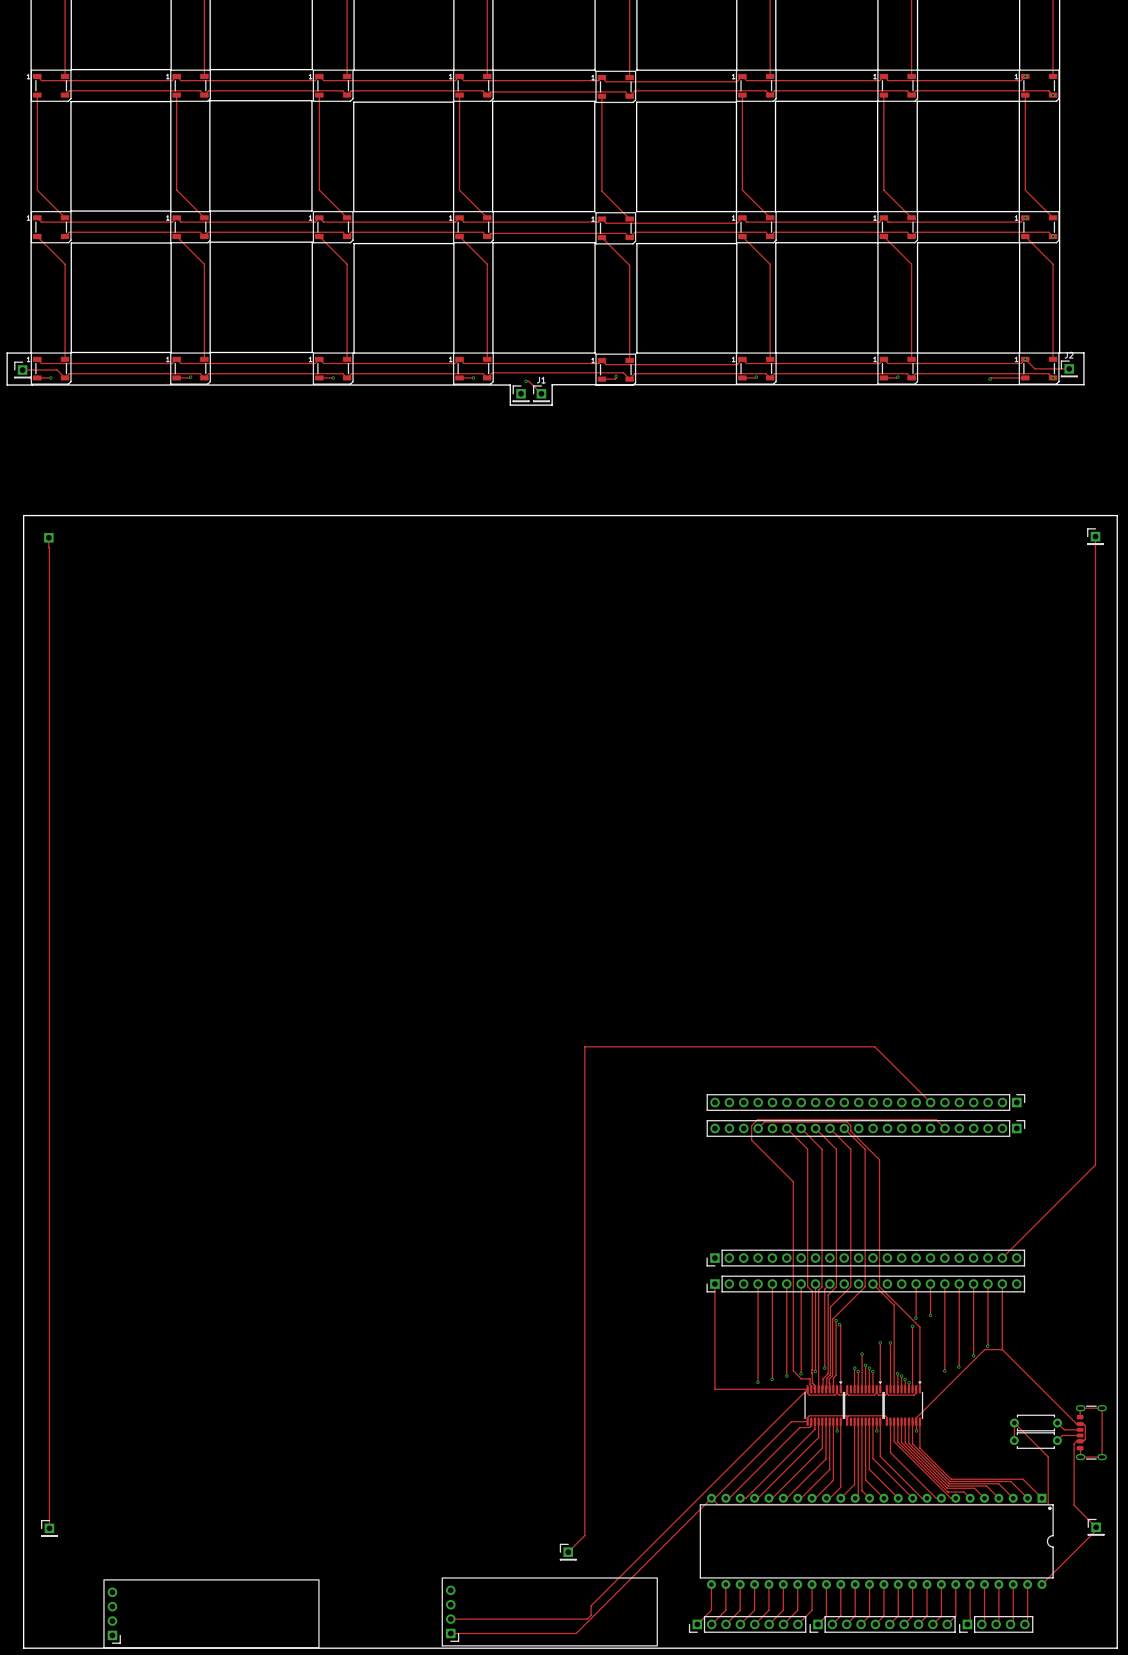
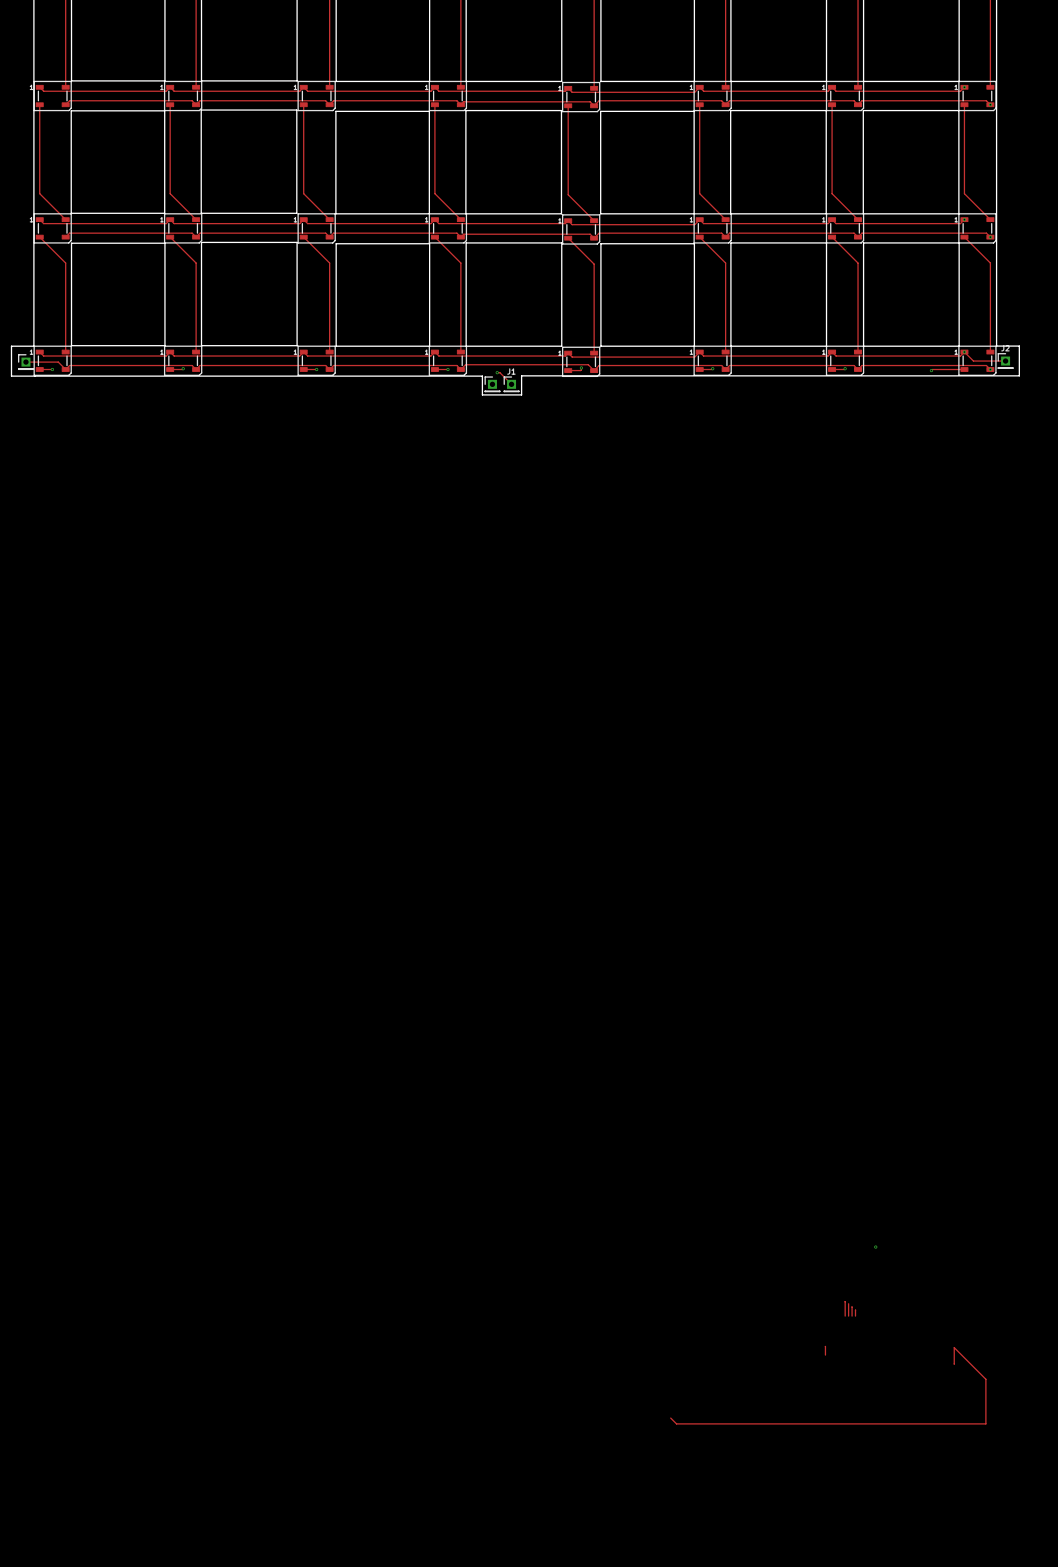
board edge: (23, 515) (1117, 515) (1117, 1648) (23, 1648) (23, 515) -> none
track: (1095, 536) (1095, 1164) (1002, 1258) -> none
part: (1095, 536) -> none
track: (48, 537) (49, 1528) -> none
part: (48, 537) -> none
part: (865, 1102) -> none
track: (930, 1102) (874, 1046) (584, 1046) (584, 1535) (568, 1552) -> none
track: (758, 1128) (764, 1121) (847, 1121) (850, 1125) (850, 1131) (879, 1159) (879, 1286) (919, 1327) (919, 1389) -> none
track: (786, 1128) (807, 1149) (807, 1286) (812, 1291) (811, 1372) (812, 1383) (814, 1389) -> none
track: (801, 1128) (822, 1149) (822, 1286) (818, 1290) (818, 1389) -> none
track: (815, 1128) (836, 1149) (836, 1286) (828, 1294) (828, 1373) (823, 1378) (822, 1389) -> none
track: (830, 1128) (850, 1149) (850, 1286) (830, 1307) (830, 1374) (826, 1378) (826, 1389) -> none
track: (844, 1128) (865, 1149) (865, 1286) (832, 1319) (832, 1375) (829, 1379) (829, 1389) -> none
part: (865, 1128) -> none
track: (944, 1128) (936, 1119) (757, 1119) (751, 1125) (751, 1140) (793, 1181) (793, 1370) (801, 1378) (810, 1378) (811, 1389) -> none
part: (865, 1258) -> none
track: (714, 1284) (714, 1389) (807, 1389) -> none
track: (758, 1284) (758, 1382) -> none
track: (772, 1284) (772, 1379) -> none
track: (786, 1284) (786, 1376) -> none
track: (801, 1284) (800, 1373) -> none
track: (815, 1284) (815, 1371) -> none
track: (829, 1284) (824, 1289) (824, 1368) -> none
part: (865, 1284) -> none
track: (873, 1284) (894, 1305) (894, 1389) -> none
track: (916, 1284) (915, 1318) -> none
track: (930, 1284) (930, 1315) -> none
track: (944, 1284) (944, 1370) -> none
track: (959, 1284) (958, 1367) -> none
track: (973, 1284) (973, 1355) -> none
track: (987, 1284) (987, 1346) -> none
track: (1002, 1284) (1002, 1349) -> none
via: (915, 1318) -> none
track: (836, 1320) (836, 1375) (833, 1378) (833, 1389) -> none
via: (836, 1320) -> none
track: (839, 1324) (840, 1389) -> none
via: (839, 1324) -> none
track: (912, 1326) (912, 1389) -> none
via: (912, 1326) -> none
track: (880, 1342) (880, 1389) -> none
via: (880, 1342) -> none
track: (890, 1342) (890, 1389) -> none
via: (890, 1342) -> none
via: (987, 1346) -> none
track: (1002, 1349) (1076, 1424) (1085, 1425) (1085, 1439) (1076, 1441) (1074, 1443) (1074, 1505) (1096, 1527) (1096, 1530) (1041, 1584) -> none
track: (1002, 1349) (984, 1349) (916, 1417) (916, 1430) -> none
track: (862, 1354) (861, 1389) -> none
via: (862, 1354) -> none
via: (973, 1355) -> none
track: (865, 1365) (865, 1389) -> none
via: (865, 1365) -> none
via: (958, 1367) -> none
via: (824, 1368) -> none
track: (854, 1368) (854, 1389) -> none
via: (854, 1368) -> none
track: (869, 1368) (869, 1389) -> none
via: (869, 1368) -> none
via: (944, 1370) -> none
via: (815, 1371) -> none
track: (858, 1371) (858, 1389) -> none
via: (858, 1371) -> none
track: (872, 1371) (872, 1389) -> none
via: (872, 1371) -> none
via: (800, 1373) -> none
via: (897, 1373) -> none
via: (786, 1376) -> none
via: (901, 1376) -> none
via: (772, 1379) -> none
via: (905, 1379) -> none
via: (757, 1382) -> none
via: (909, 1382) -> none
track: (807, 1389) (809, 1395) (834, 1395) (837, 1393) -> none
track: (807, 1389) (591, 1605) (591, 1615) (587, 1619) (450, 1619) -> none
track: (847, 1389) (845, 1395) (839, 1395) (837, 1393) -> none
track: (916, 1389) (914, 1395) (888, 1395) (886, 1393) -> none
track: (876, 1393) (874, 1395) (848, 1395) (847, 1393) -> none
track: (876, 1393) (878, 1395) (886, 1393) -> none
part: (824, 1403) -> none
part: (863, 1403) -> none
part: (903, 1403) -> none
track: (847, 1417) (848, 1415) (885, 1415) (886, 1421) -> none
track: (1080, 1417) (1080, 1408) (1102, 1408) (1102, 1457) (1080, 1457) (1080, 1448) -> none
track: (811, 1421) (809, 1427) (799, 1427) (729, 1498) (725, 1498) -> none
track: (814, 1421) (814, 1429) (745, 1498) (740, 1498) -> none
track: (818, 1421) (818, 1437) (757, 1498) (754, 1498) -> none
track: (822, 1421) (822, 1448) (772, 1498) (768, 1498) -> none
track: (826, 1421) (826, 1458) (786, 1498) (783, 1498) -> none
track: (829, 1421) (829, 1469) (801, 1498) (797, 1498) -> none
track: (833, 1421) (833, 1480) (815, 1498) (812, 1498) -> none
track: (837, 1421) (837, 1430) -> none
track: (840, 1421) (840, 1487) (829, 1498) (826, 1498) -> none
track: (847, 1421) (846, 1415) (809, 1415) (807, 1421) (791, 1421) (714, 1498) (711, 1498) (576, 1633) (450, 1633) -> none
track: (854, 1421) (854, 1484) (840, 1498) -> none
track: (858, 1421) (858, 1495) (855, 1498) -> none
track: (861, 1421) (861, 1490) (869, 1498) -> none
track: (865, 1421) (865, 1479) (883, 1498) -> none
track: (869, 1421) (869, 1469) (898, 1498) -> none
track: (872, 1421) (872, 1458) (912, 1498) -> none
track: (880, 1421) (880, 1456) (922, 1498) (927, 1498) -> none
track: (890, 1421) (890, 1452) (936, 1498) (941, 1498) -> none
track: (894, 1421) (894, 1441) (950, 1498) (955, 1498) -> none
track: (897, 1421) (897, 1442) (947, 1492) (963, 1492) (970, 1498) -> none
track: (901, 1421) (901, 1442) (947, 1488) (974, 1488) (984, 1498) -> none
track: (905, 1421) (905, 1442) (948, 1486) (986, 1486) (998, 1498) -> none
track: (908, 1421) (908, 1443) (949, 1483) (998, 1483) (1013, 1498) -> none
track: (912, 1421) (912, 1443) (950, 1481) (1010, 1481) (1027, 1498) -> none
track: (919, 1421) (919, 1448) (951, 1479) (1022, 1479) (1041, 1498) -> none
part: (1035, 1423) -> none
track: (1057, 1423) (1064, 1429) (1080, 1429) -> none
via: (837, 1430) -> none
via: (876, 1430) -> none
via: (916, 1430) -> none
part: (1091, 1432) -> none
track: (1080, 1435) (1062, 1435) (1057, 1440) -> none
part: (1035, 1440) -> none
part: (1096, 1527) -> none
part: (49, 1528) -> none
part: (876, 1541) -> none
part: (568, 1552) -> none
track: (711, 1584) (711, 1610) (697, 1624) -> none
track: (725, 1584) (725, 1610) (711, 1624) -> none
track: (740, 1584) (740, 1610) (726, 1624) -> none
track: (754, 1584) (754, 1610) (740, 1624) -> none
track: (768, 1584) (768, 1610) (754, 1624) -> none
track: (783, 1584) (783, 1610) (769, 1624) -> none
track: (797, 1584) (797, 1610) (783, 1624) -> none
track: (812, 1584) (812, 1610) (797, 1624) -> none
track: (826, 1584) (826, 1615) (817, 1624) -> none
track: (840, 1584) (840, 1615) (832, 1624) -> none
track: (855, 1584) (855, 1615) (846, 1624) -> none
track: (869, 1584) (869, 1615) (861, 1624) -> none
track: (883, 1584) (883, 1615) (875, 1624) -> none
track: (898, 1584) (898, 1615) (889, 1624) -> none
track: (912, 1584) (912, 1615) (904, 1624) -> none
track: (927, 1584) (927, 1615) (918, 1624) -> none
track: (941, 1584) (941, 1615) (932, 1624) -> none
track: (955, 1584) (955, 1615) (947, 1624) -> none
track: (970, 1584) (970, 1621) (967, 1624) -> none
track: (984, 1584) (984, 1621) (981, 1624) -> none
track: (998, 1584) (998, 1621) (996, 1624) -> none
track: (1013, 1584) (1013, 1621) (1010, 1624) -> none
track: (1027, 1584) (1027, 1621) (1024, 1624) -> none
part: (549, 1611) -> none
part: (211, 1613) -> none
part: (747, 1624) -> none
part: (882, 1624) -> none
part: (996, 1624) -> none

